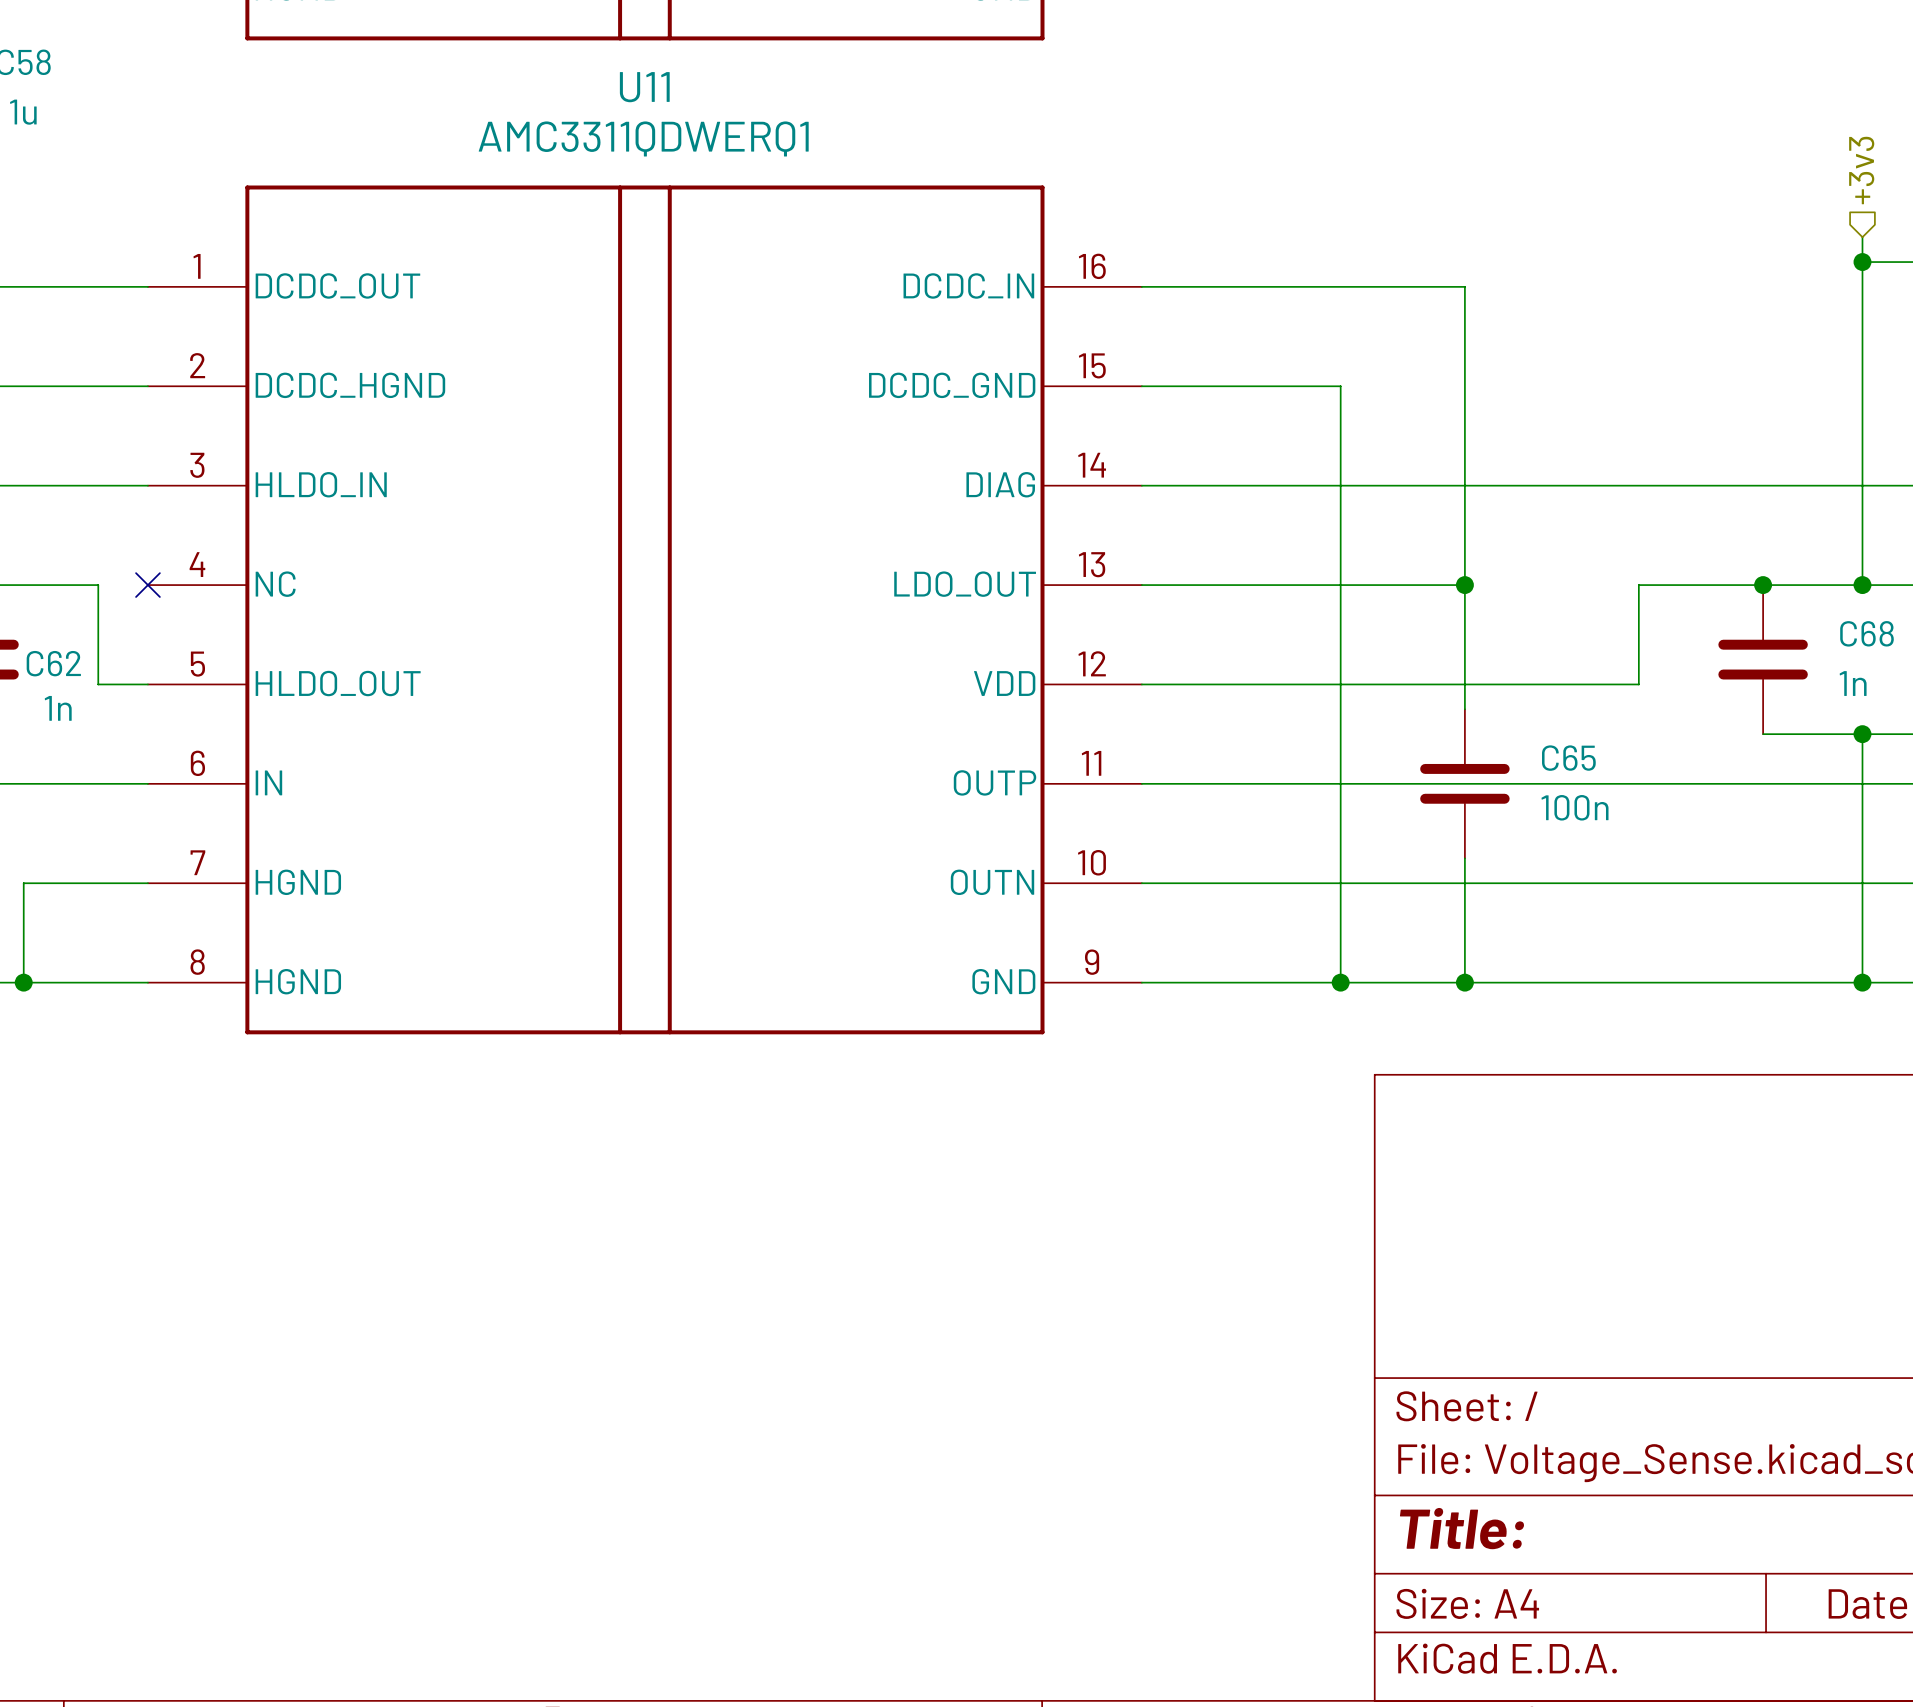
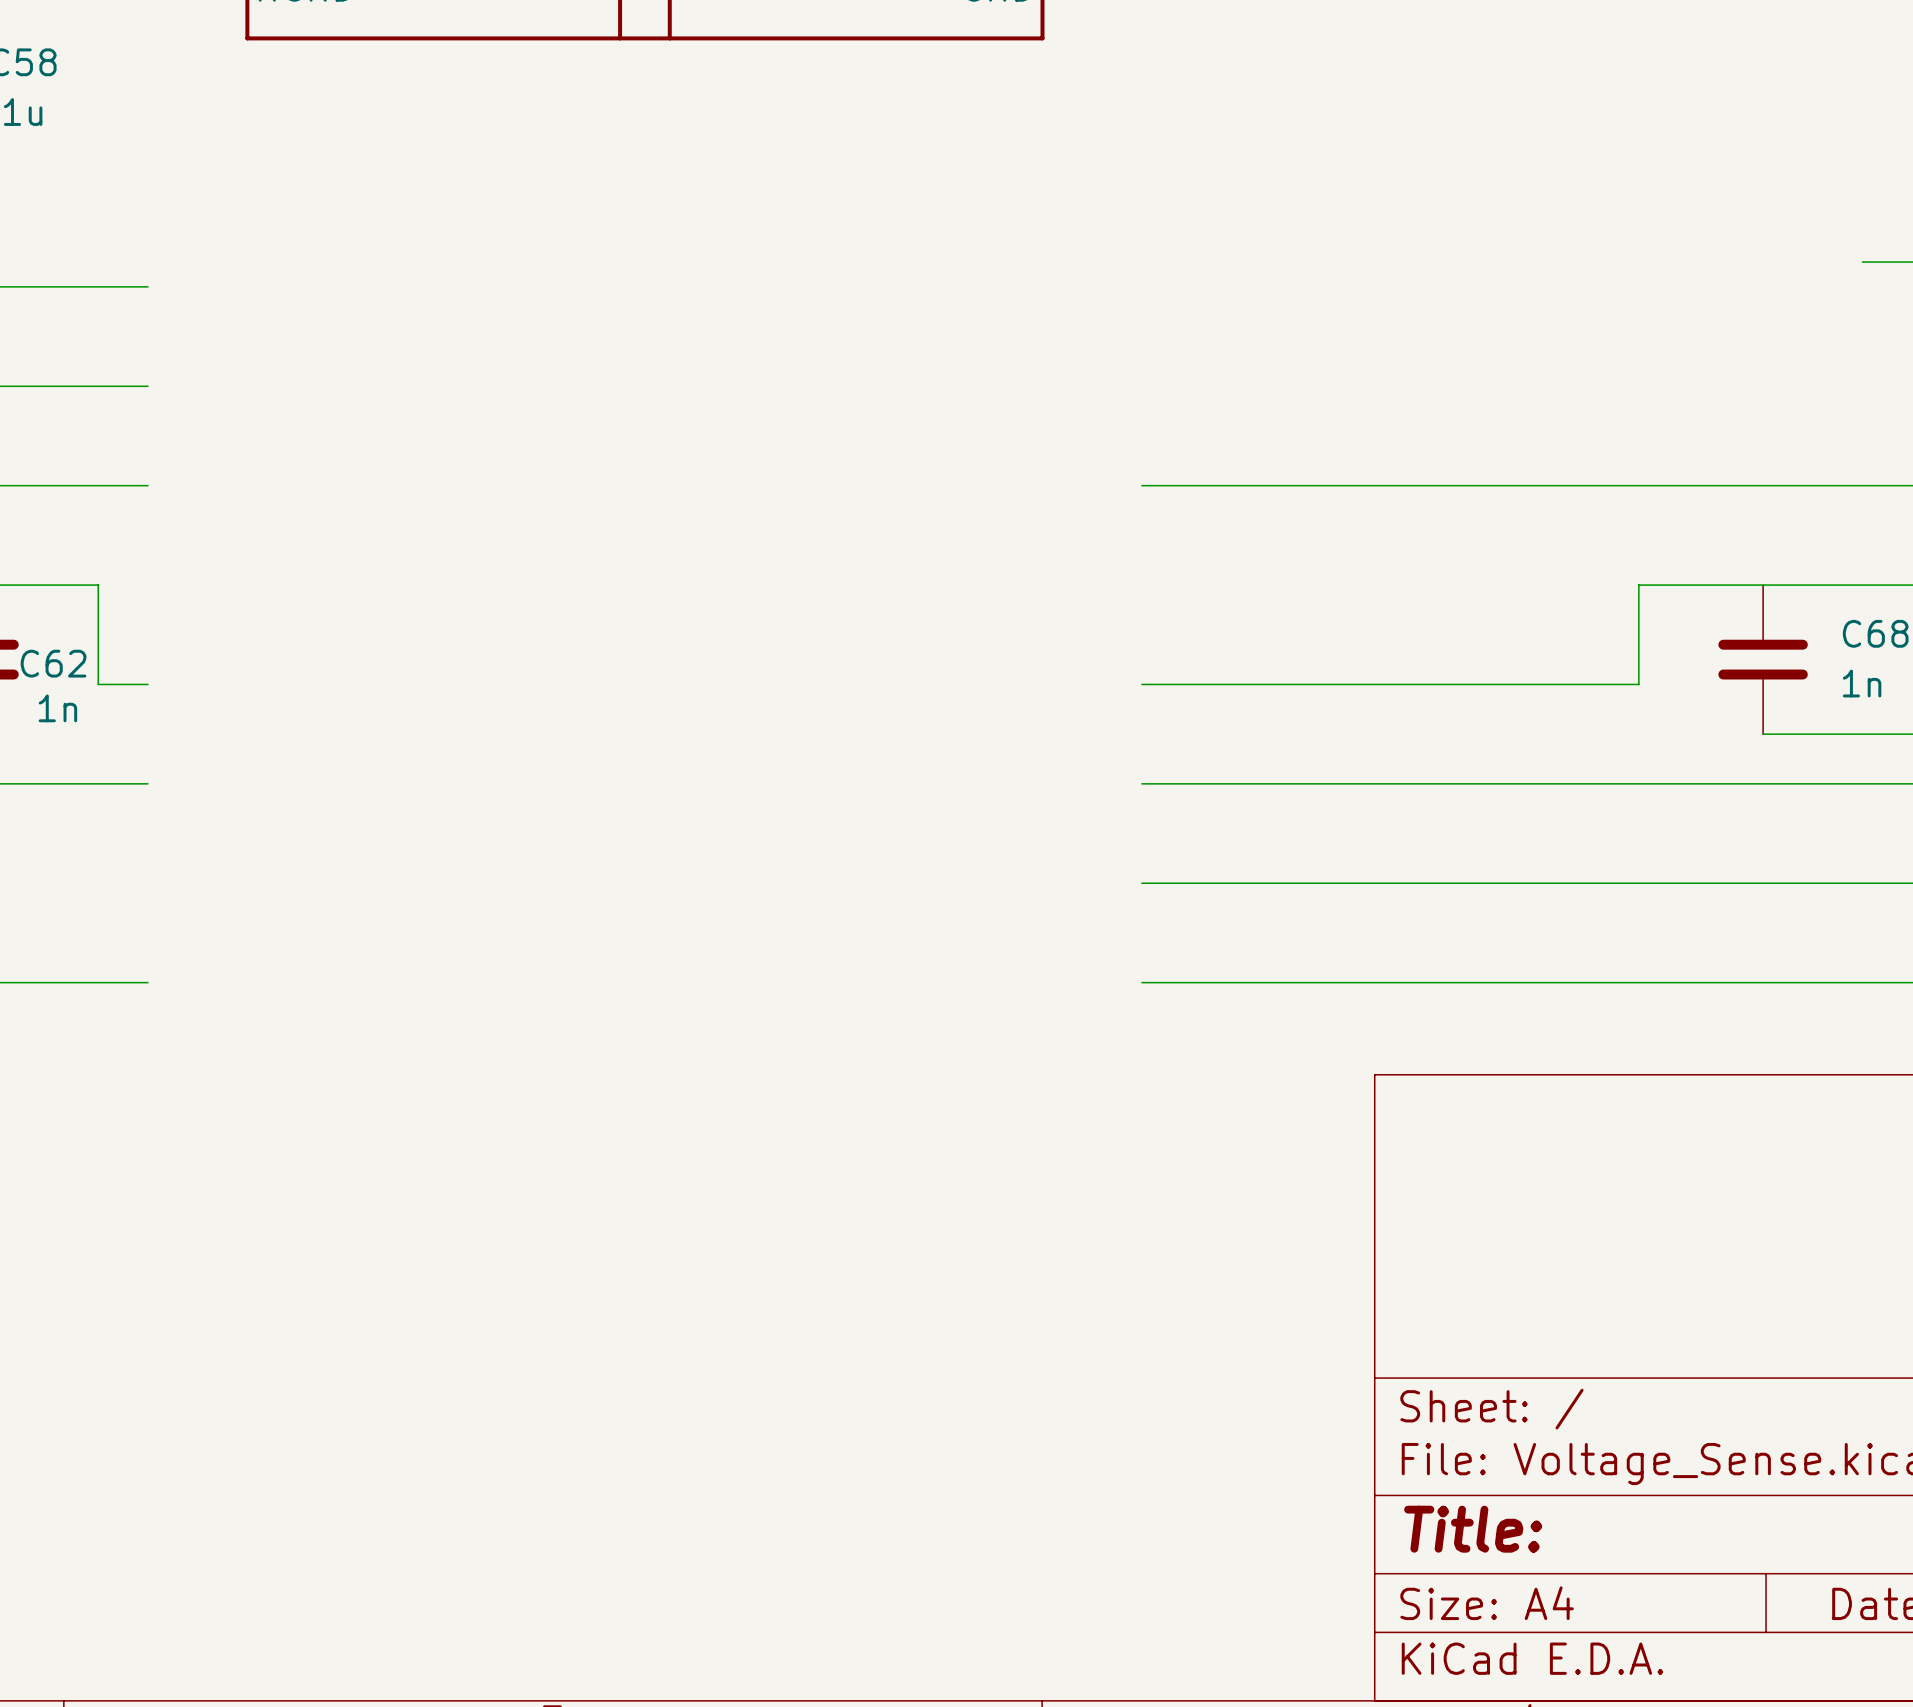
hierarchical label: +3v3 (1861, 170) -> none
wire: (1862, 237) (1862, 585) -> none
junction: (1862, 262) -> none
wire: (1141, 286) (1464, 286) (1464, 709) -> none
wire: (1141, 386) (1340, 386) (1340, 982) -> none
no-connect mark: (147, 585) -> none
wire: (1141, 585) (1464, 585) -> none
junction: (1464, 585) -> none
junction: (1763, 585) -> none
junction: (1862, 585) -> none
U11: AMC3311QDWERQ1 (644, 609) -> none
wire: (1862, 734) (1862, 982) -> none
junction: (1862, 734) -> none
C65: 100n (1464, 783) -> none
wire: (1464, 858) (1464, 982) -> none
wire: (147, 883) (23, 883) (23, 982) -> none
junction: (23, 982) -> none
junction: (1340, 982) -> none
junction: (1464, 982) -> none
junction: (1862, 982) -> none

